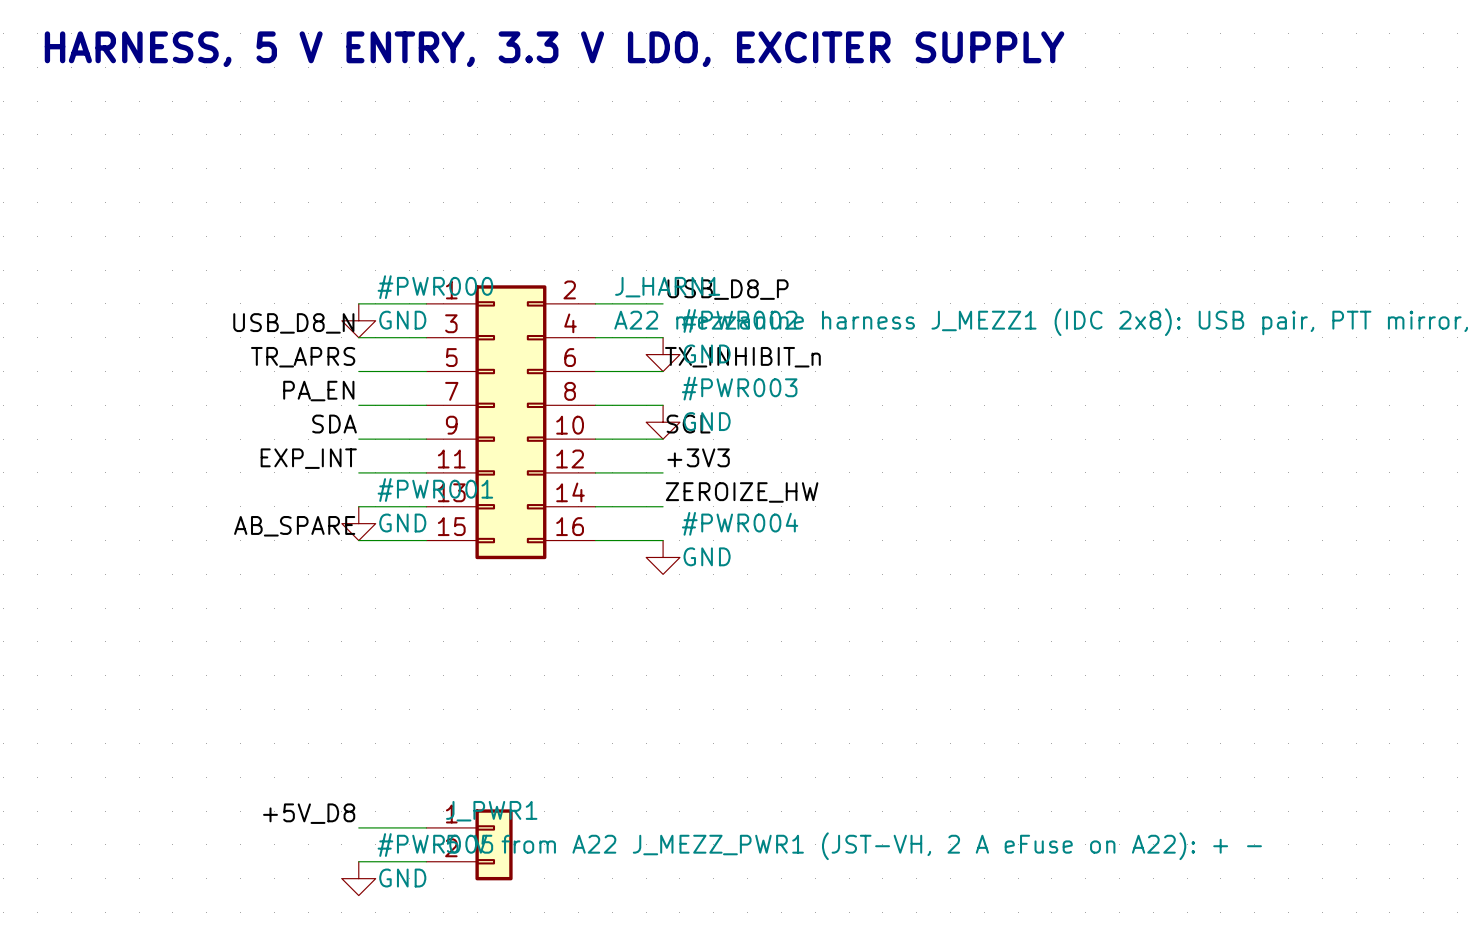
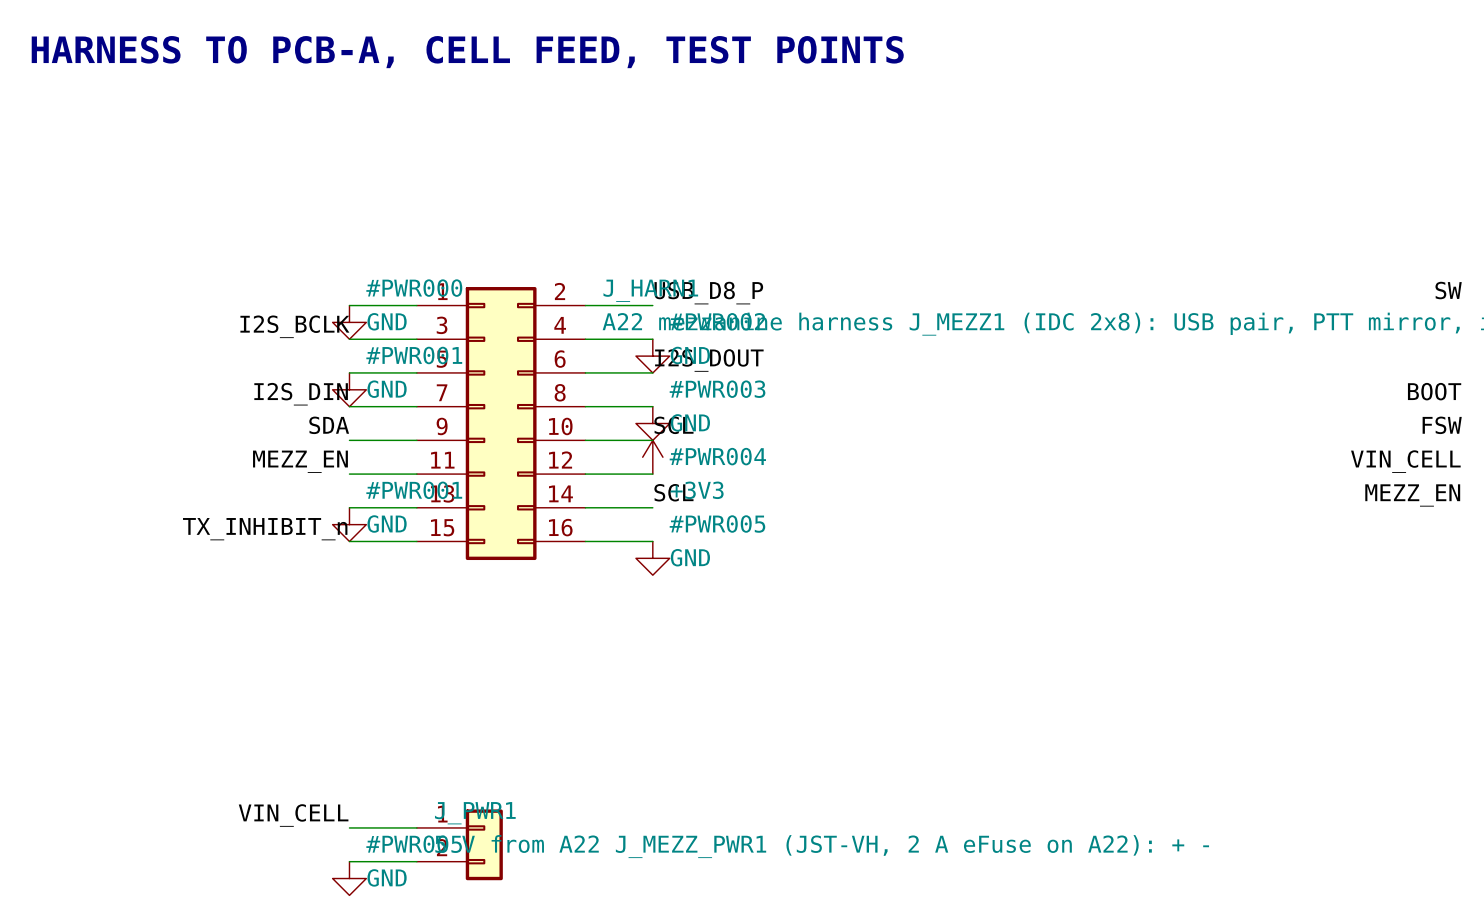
text: HARNESS, 5 V ENTRY, 3.3 V LDO, EXCITER SUPPLY (554, 49) -> HARNESS TO PCB-A, CELL FEED, TEST POINTS (467, 52)
label: none -> SW (1448, 290)
label: USB_D8_N (293, 323) -> I2S_BCLK (294, 326)
label: TR_APRS (303, 357) -> none
label: TX_INHIBIT_n (742, 357) -> I2S_DOUT (709, 360)
#PWR001: none -> GND (349, 389)
label: none -> BOOT (1434, 391)
label: PA_EN (318, 391) -> I2S_DIN (301, 394)
label: none -> FSW (1442, 425)
#PWR004: none -> +3V3 (652, 457)
label: +3V3 (698, 457) -> none
label: EXP_INT (308, 458) -> MEZZ_EN (300, 461)
label: none -> VIN_CELL (1405, 461)
label: ZEROIZE_HW (742, 492) -> SCL (673, 492)
label: none -> MEZZ_EN (1412, 495)
#PWR004 name: #PWR004 (740, 523) -> #PWR005 (717, 524)
label: AB_SPARE (294, 526) -> TX_INHIBIT_n (265, 529)
label: +5V_D8 (309, 813) -> VIN_CELL (293, 815)

